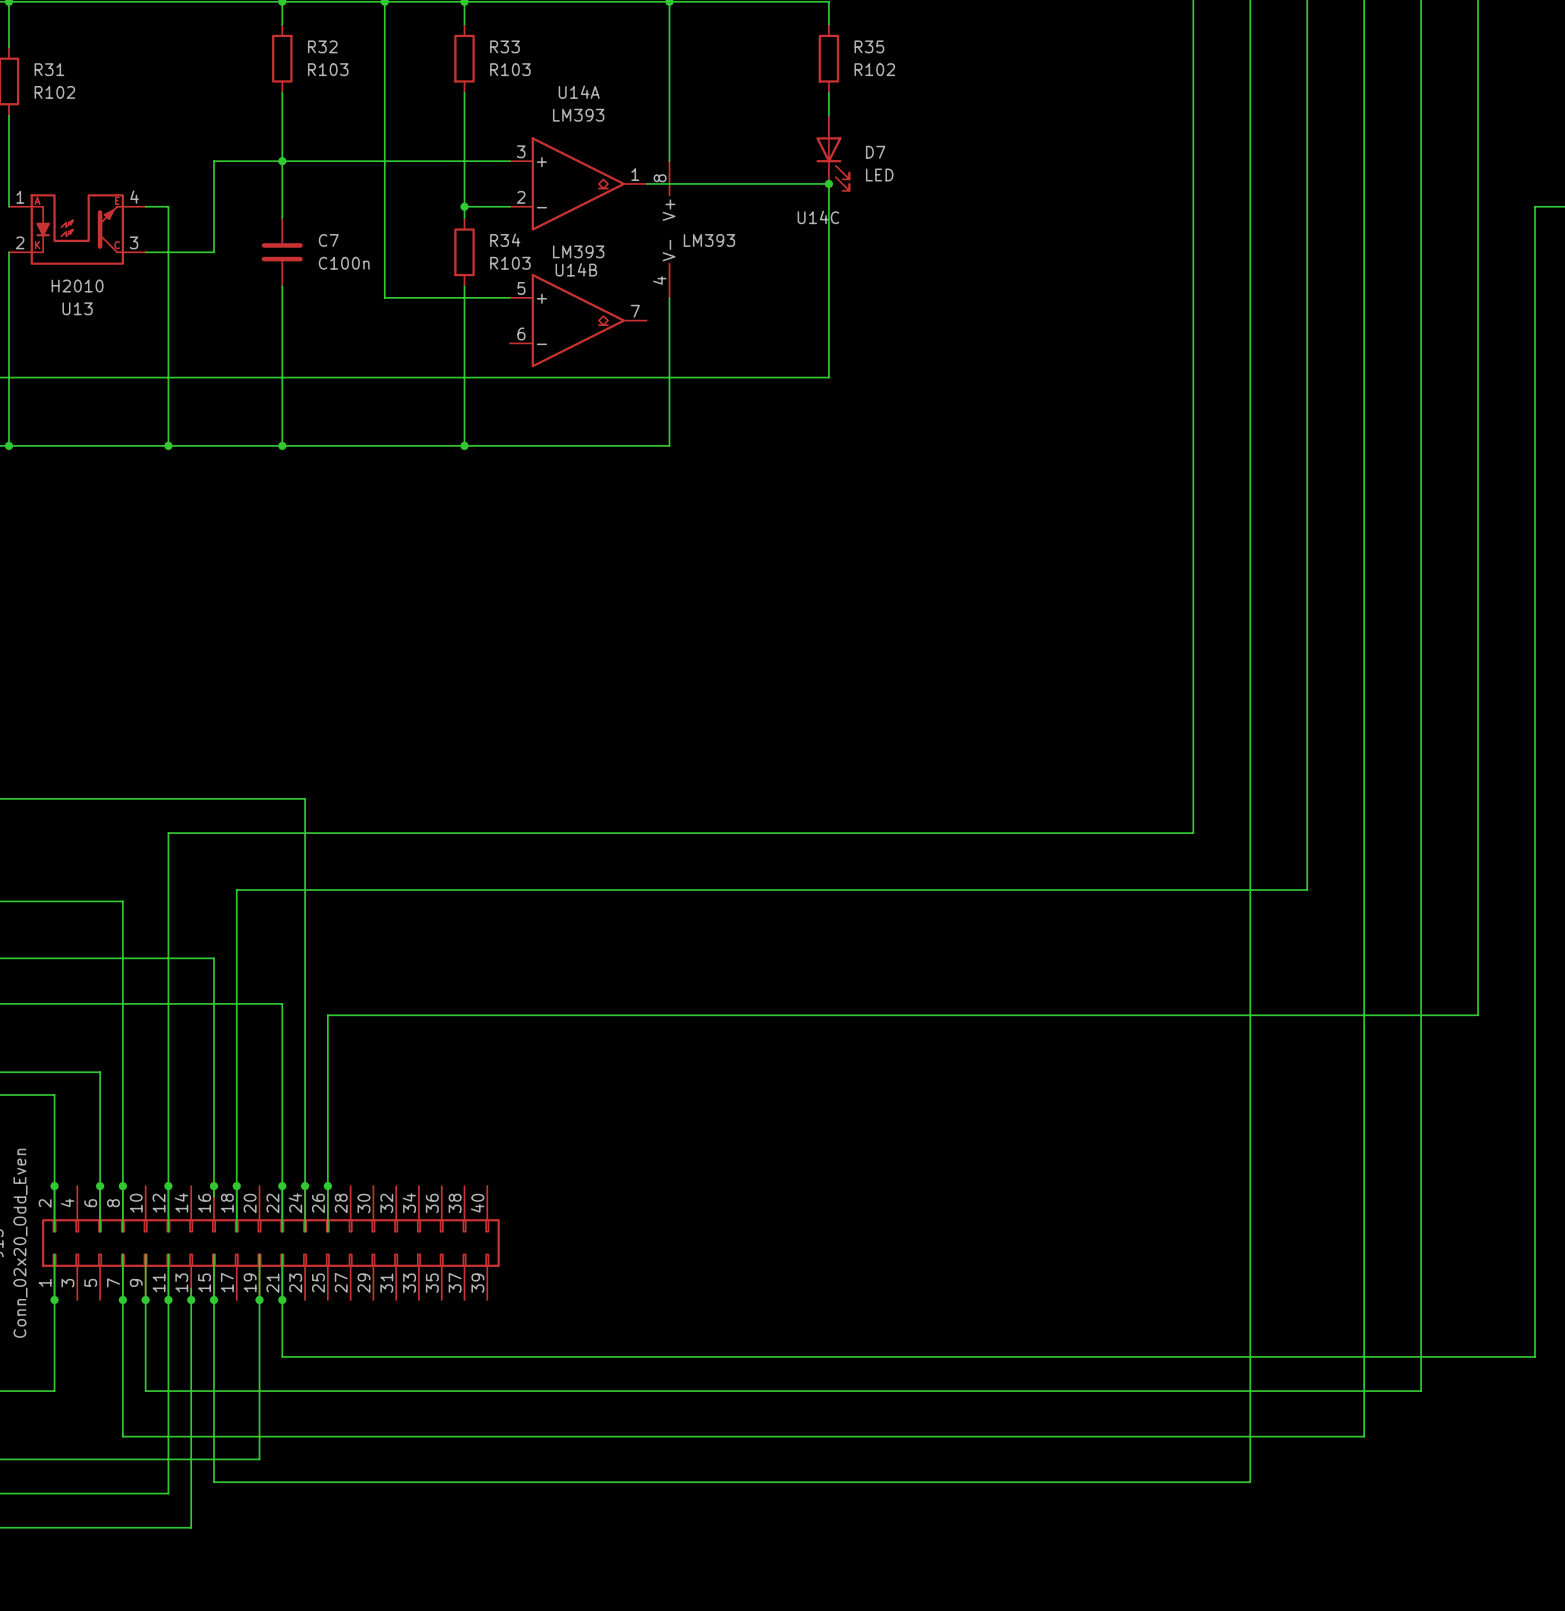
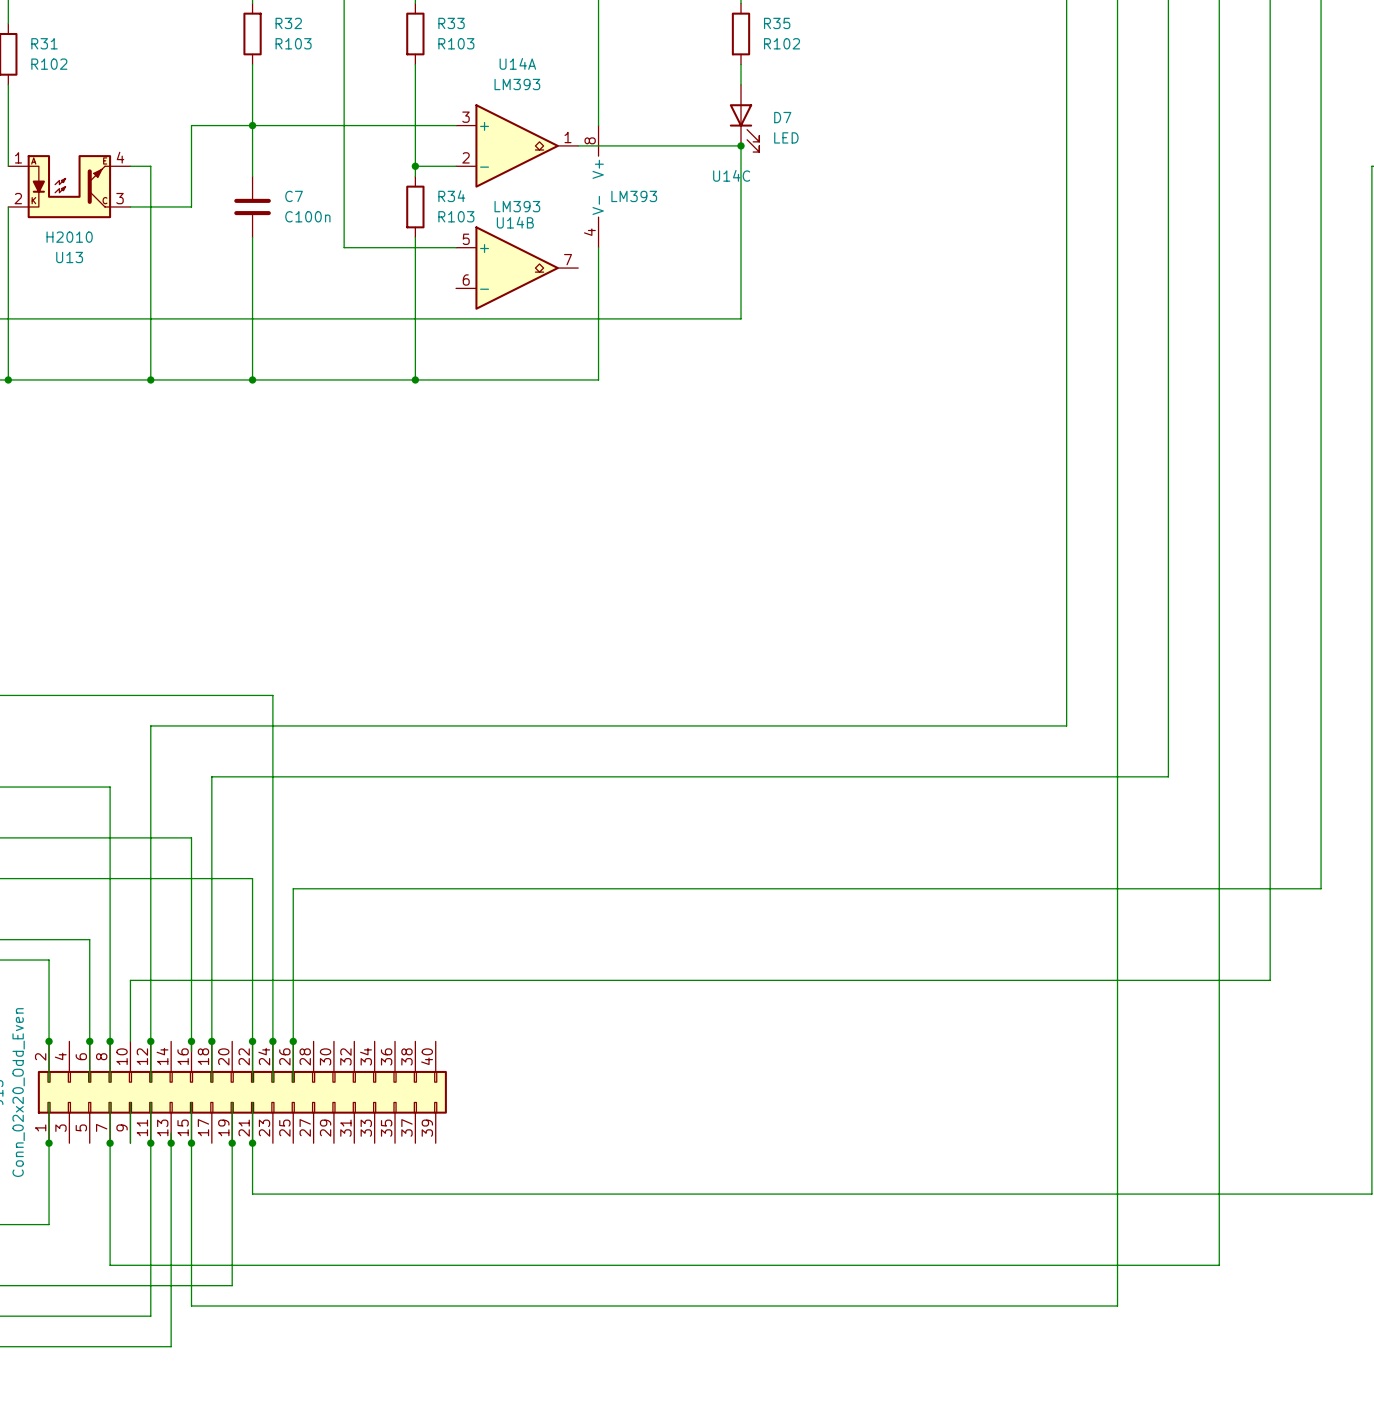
wire: (1421, 1117) (1421, 1391) (145, 1391) (145, 1299) -> (1270, 980) (130, 980) (130, 1041)
junction: (145, 1299) -> none

